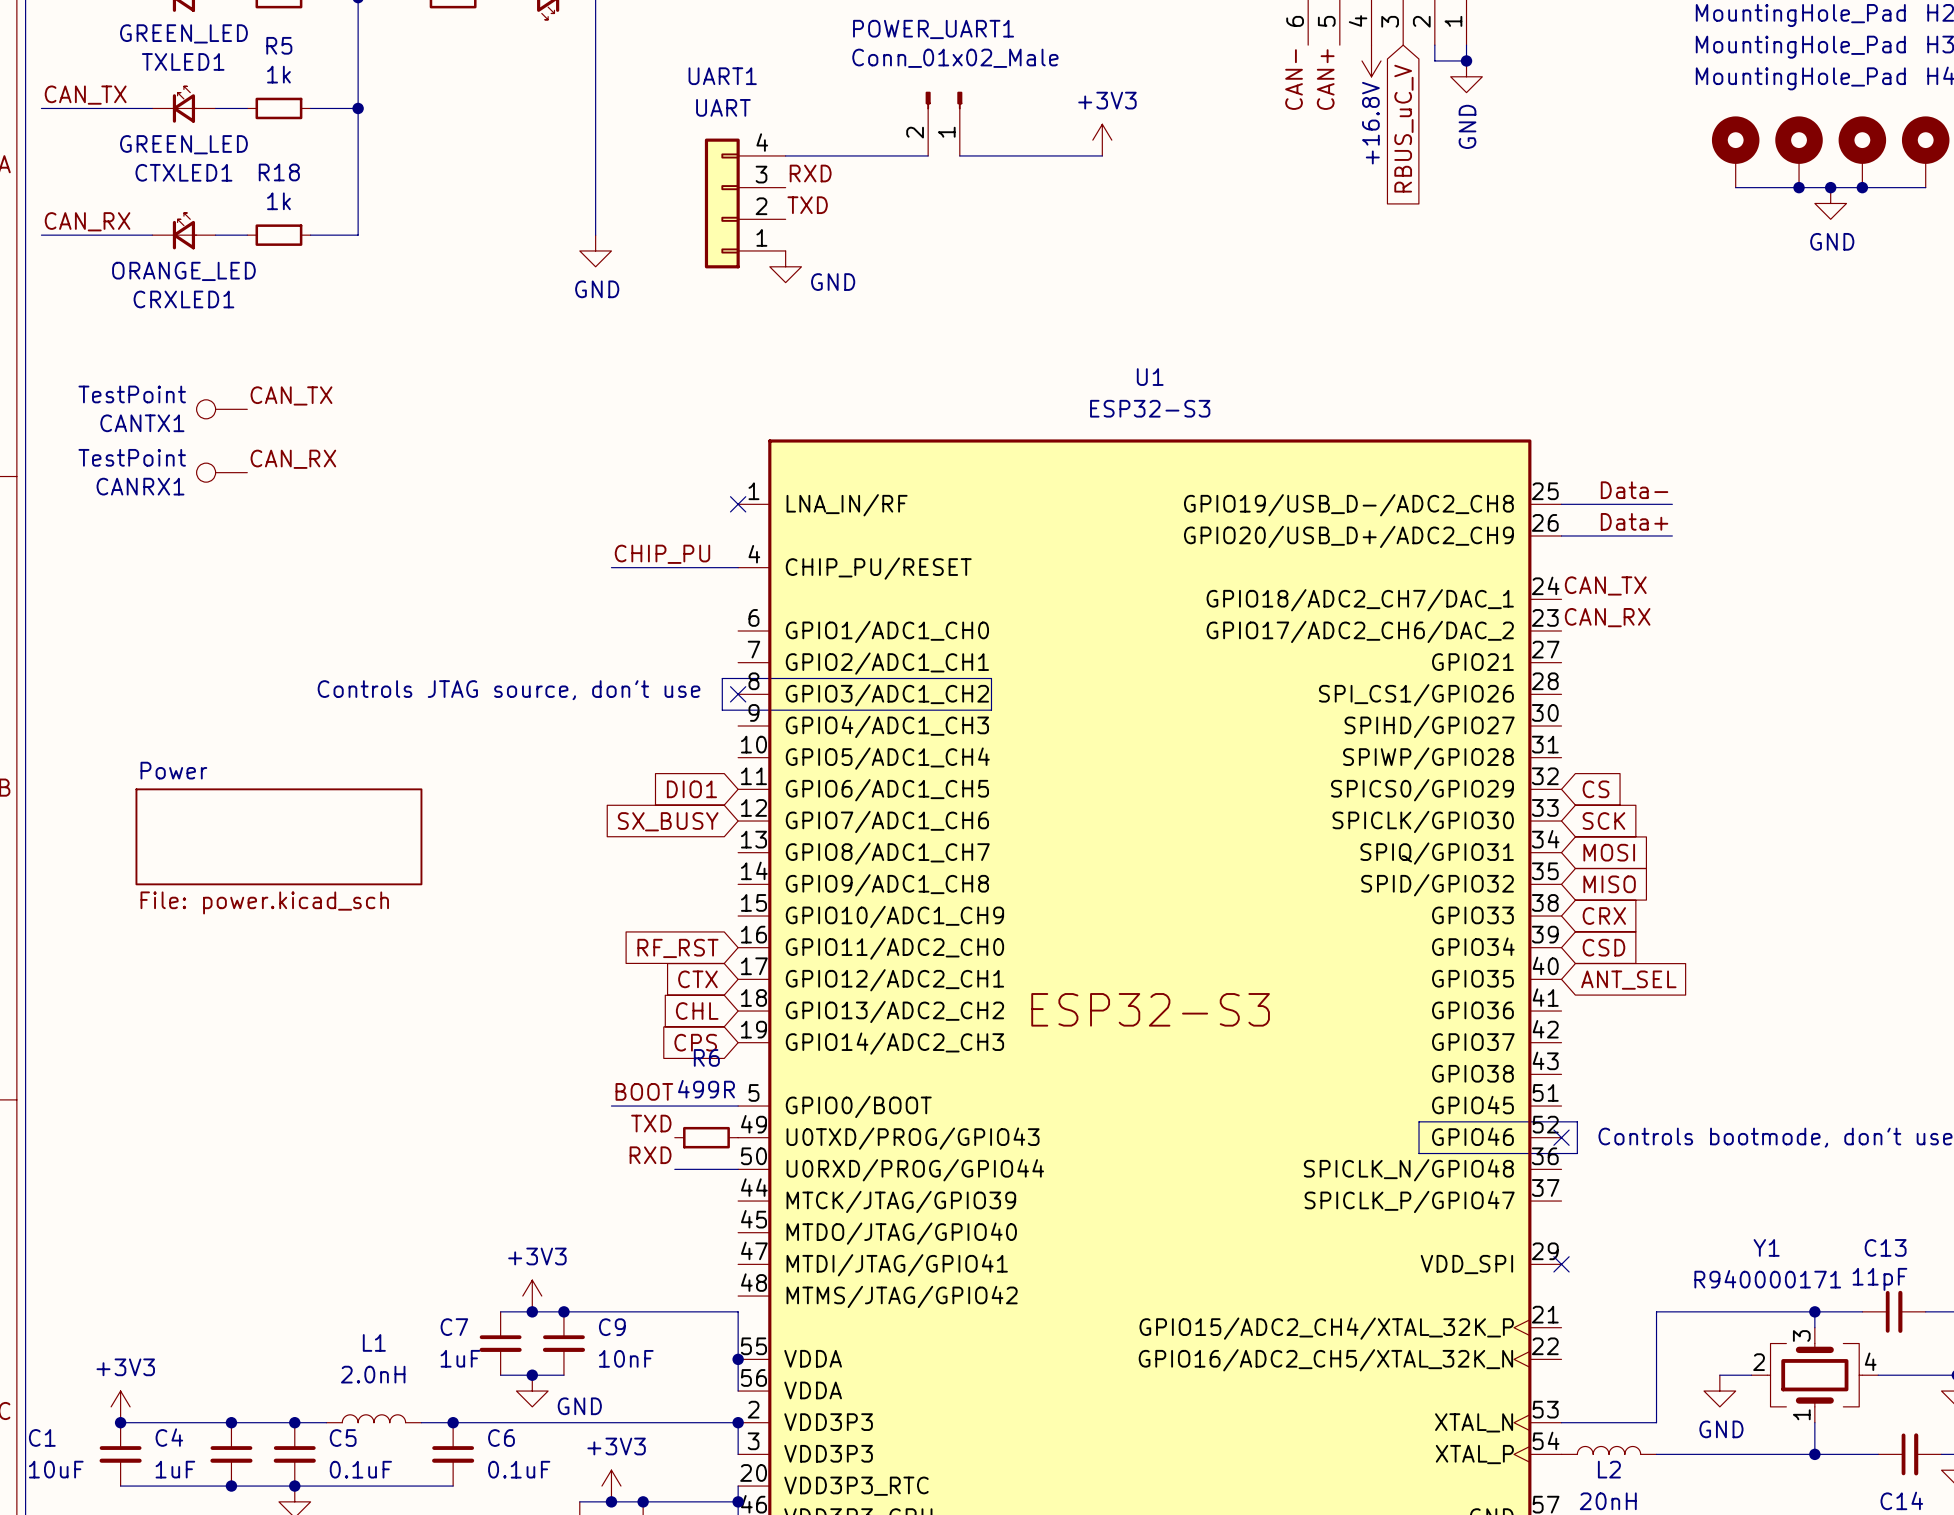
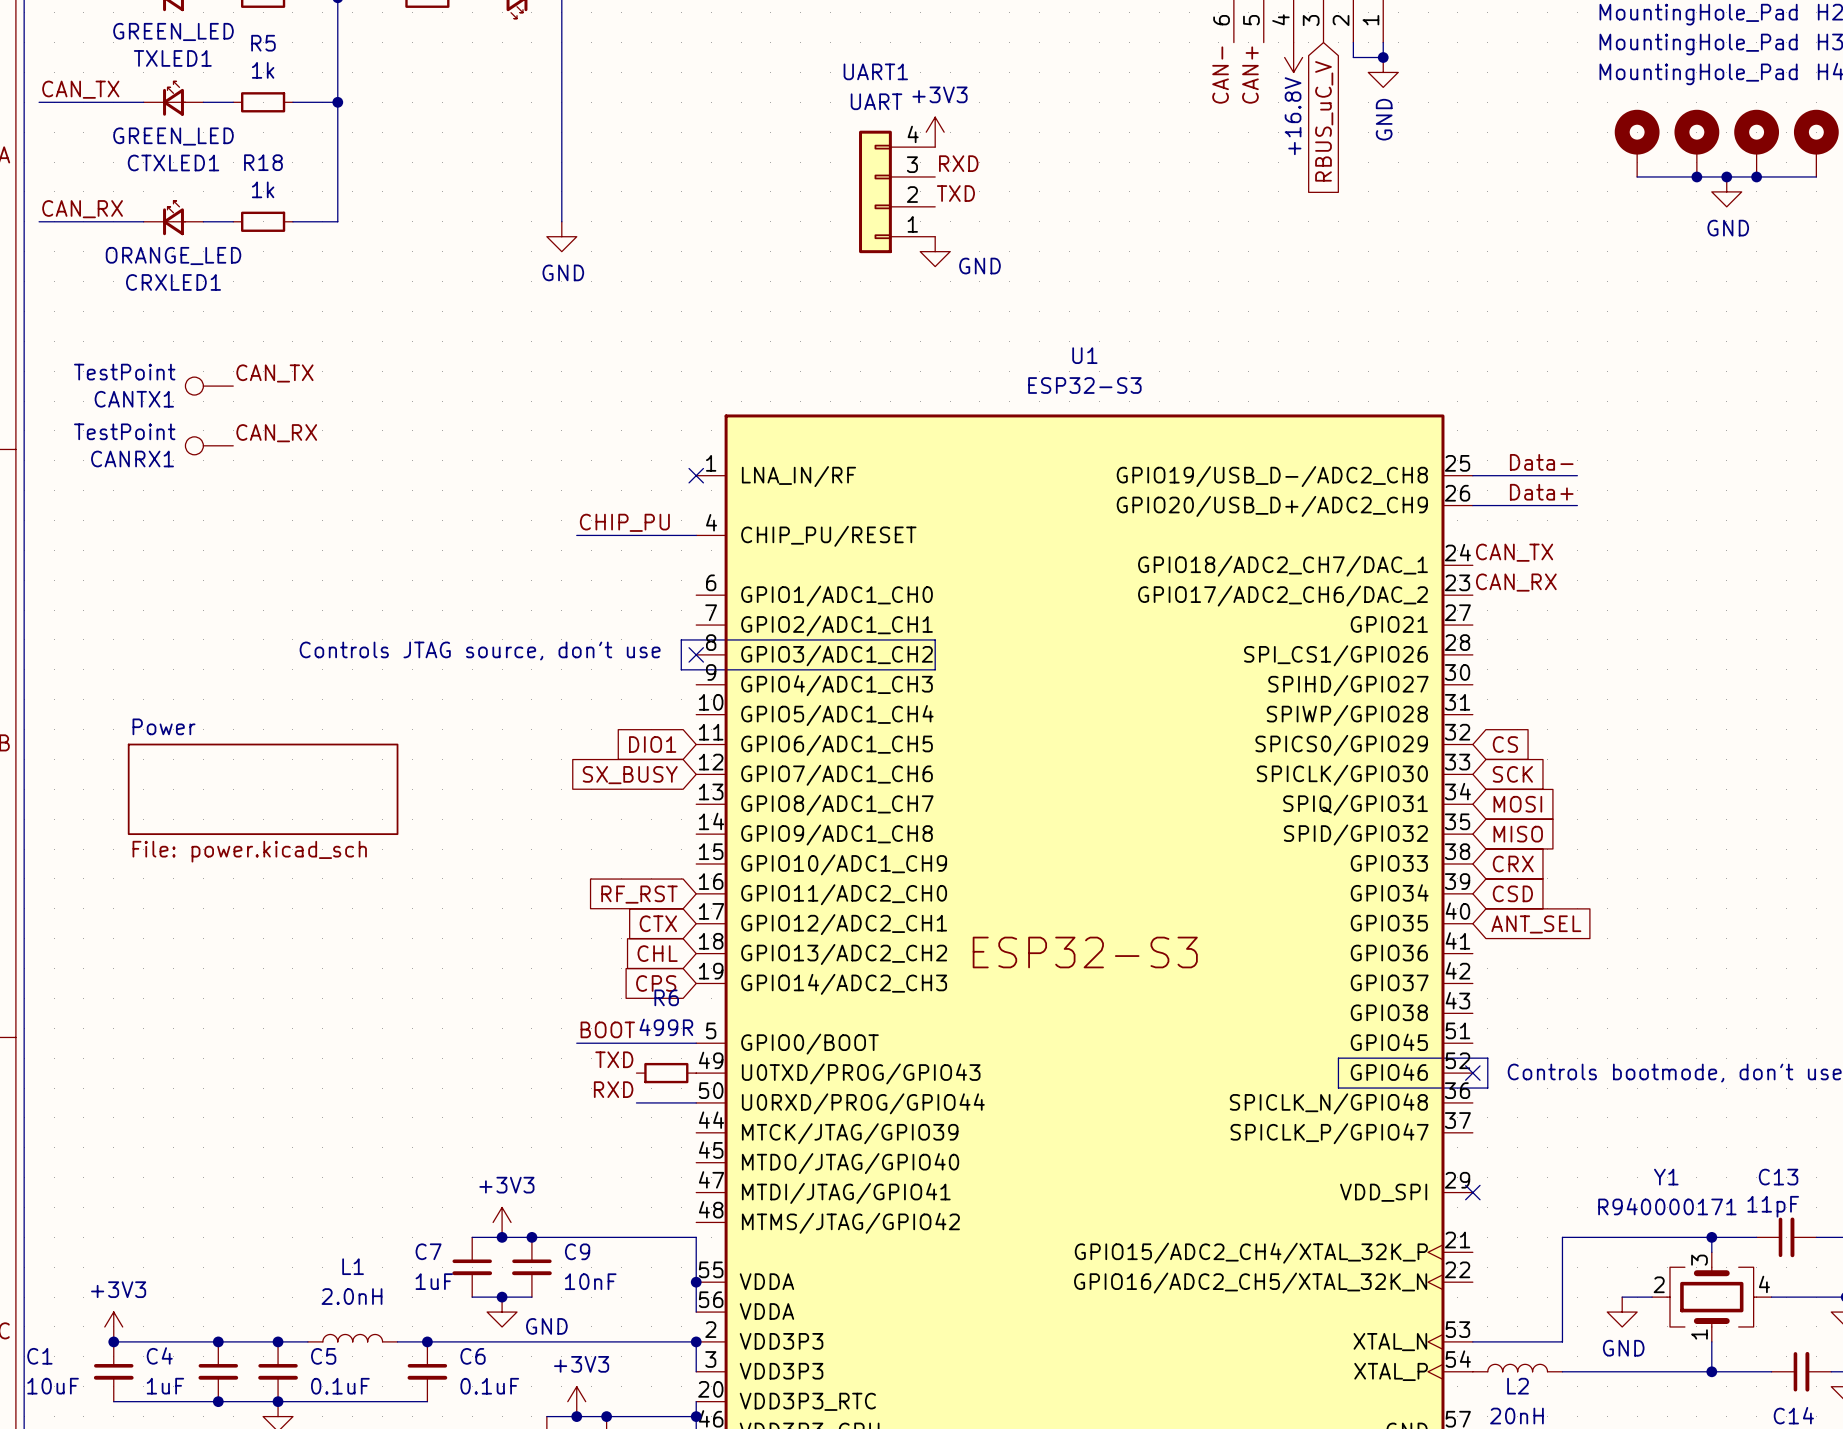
POWER_UART1: Conn_01x02_Male (943, 123) -> none
power symbol position: +3V3 (1102, 140) -> +3V3 (935, 132)
wire: (785, 155) (928, 155) -> none
wire: (959, 155) (1102, 155) -> none
label position: RXD (810, 173) -> RXD (958, 163)
UART1 position: (745, 203) -> (897, 191)
label position: TXD (807, 205) -> TXD (955, 193)
power symbol position: GND (785, 266) -> GND (935, 251)

